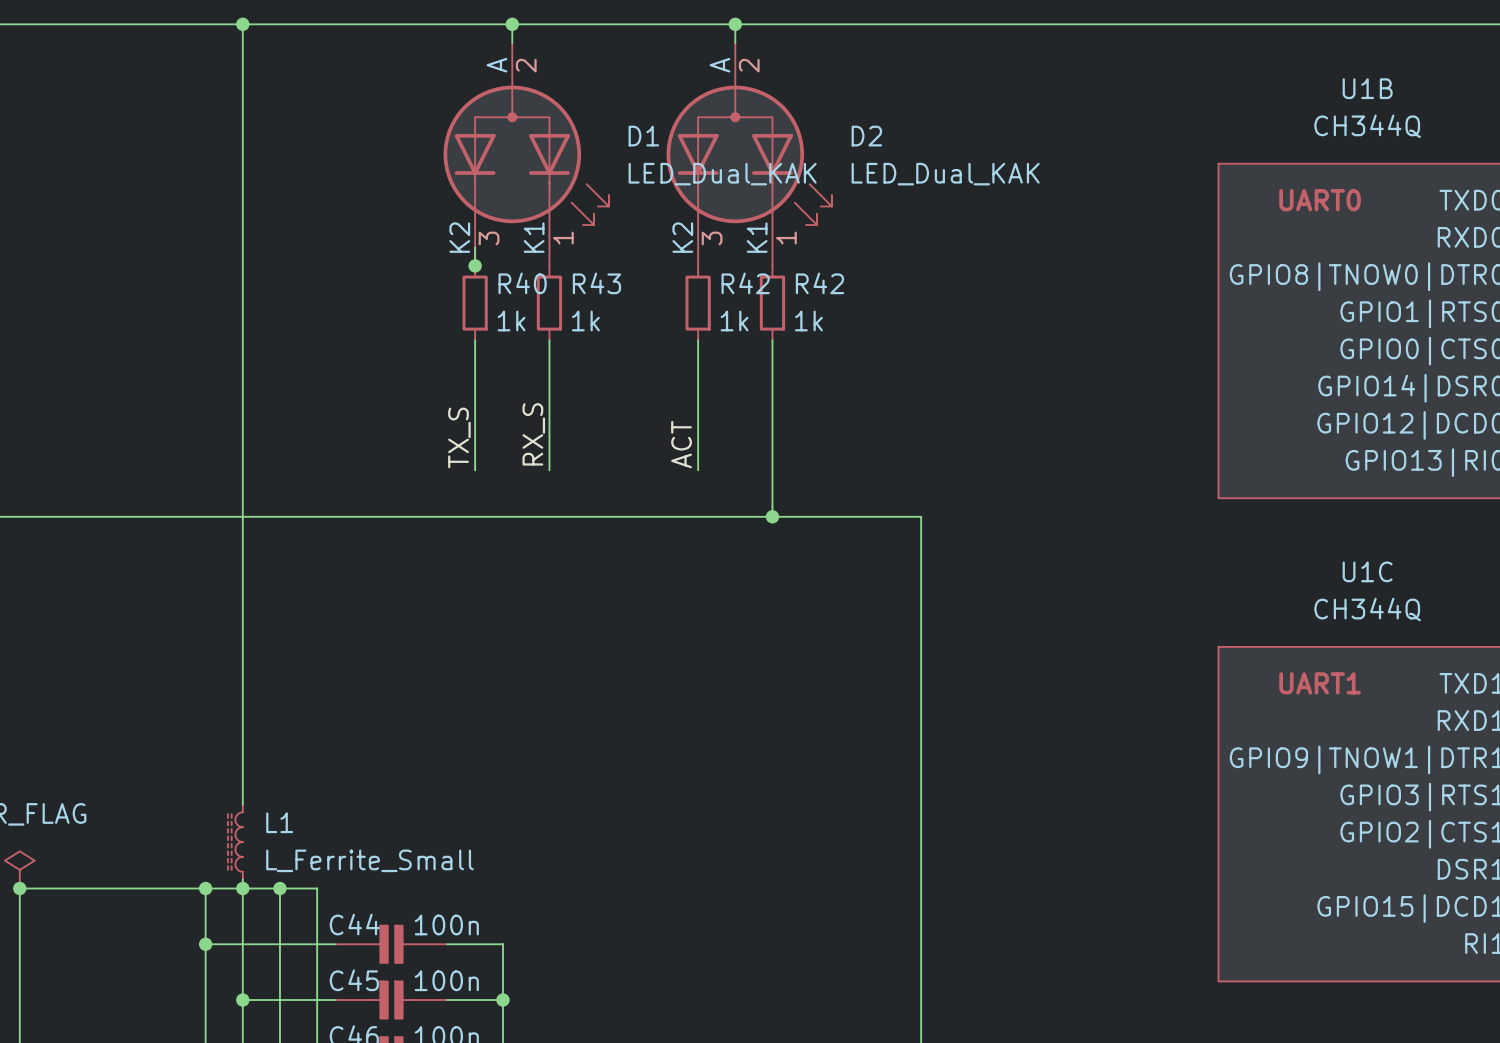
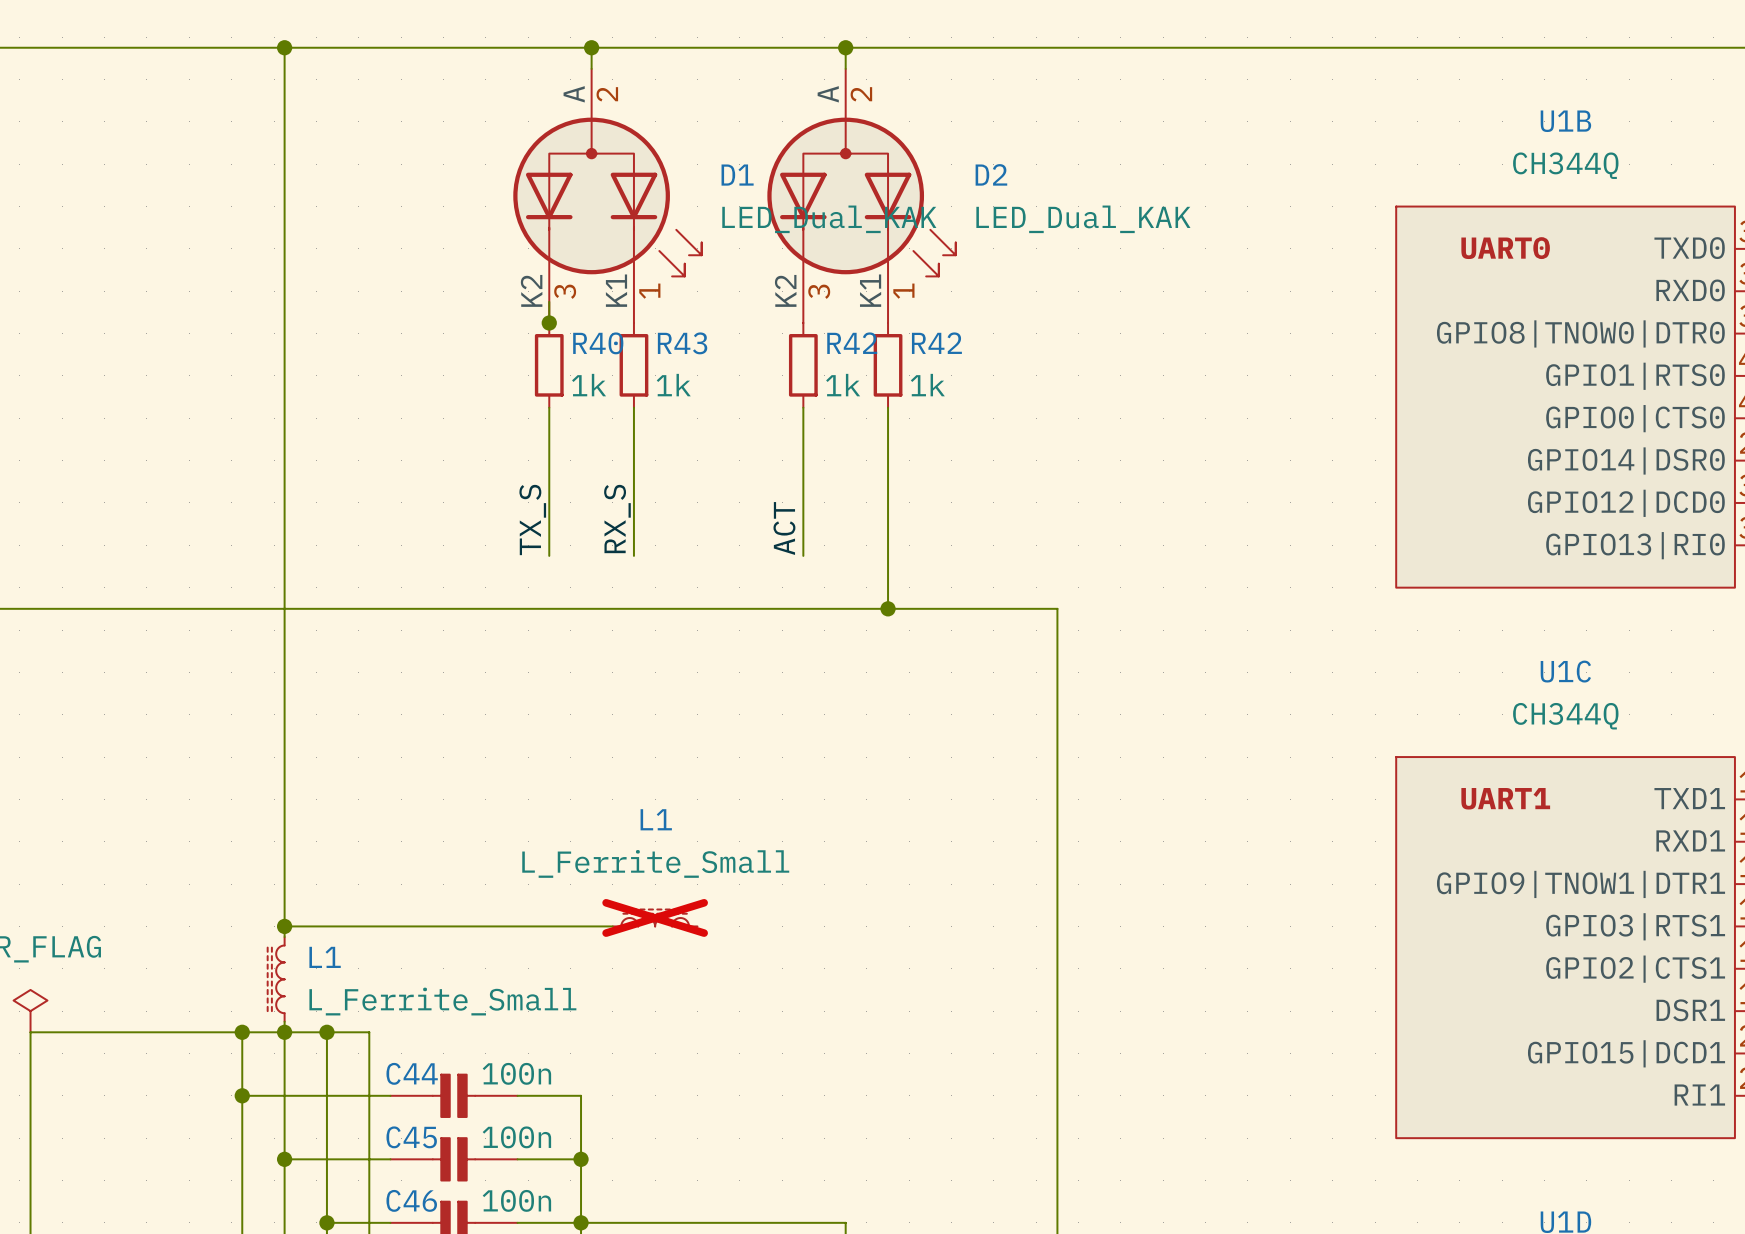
L1: none -> L_Ferrite_Small (655, 917)
wire: none -> (284, 926) (612, 926)
junction: none -> (284, 926)
junction: (19, 888) -> none

